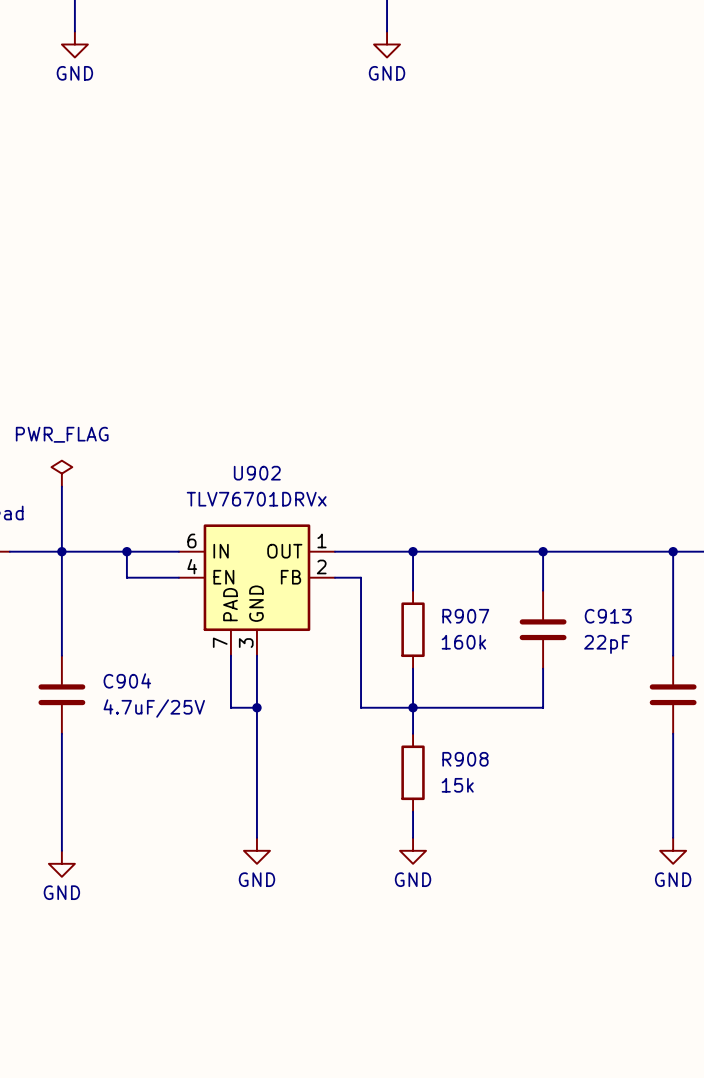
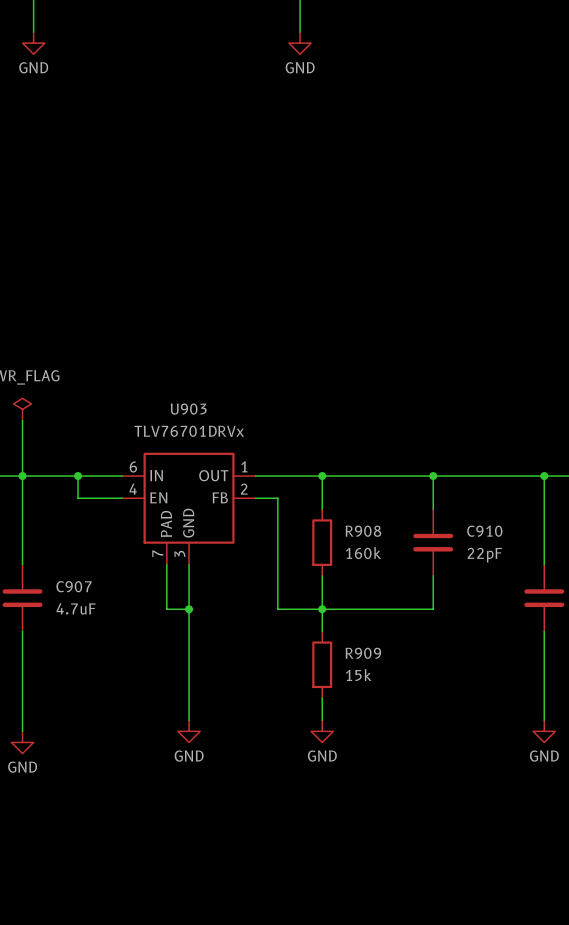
U902 name: U902 (257, 473) -> U903 (188, 409)
R907 name: R907 (465, 616) -> R908 (363, 531)
C913 name: C913 (608, 616) -> C910 (484, 531)
C904 name: C904 (127, 680) -> C907 (74, 586)
C904 value: 4.7uF/25V (154, 708) -> 4.7uF (76, 608)
R908 name: R908 (465, 759) -> R909 (363, 653)

